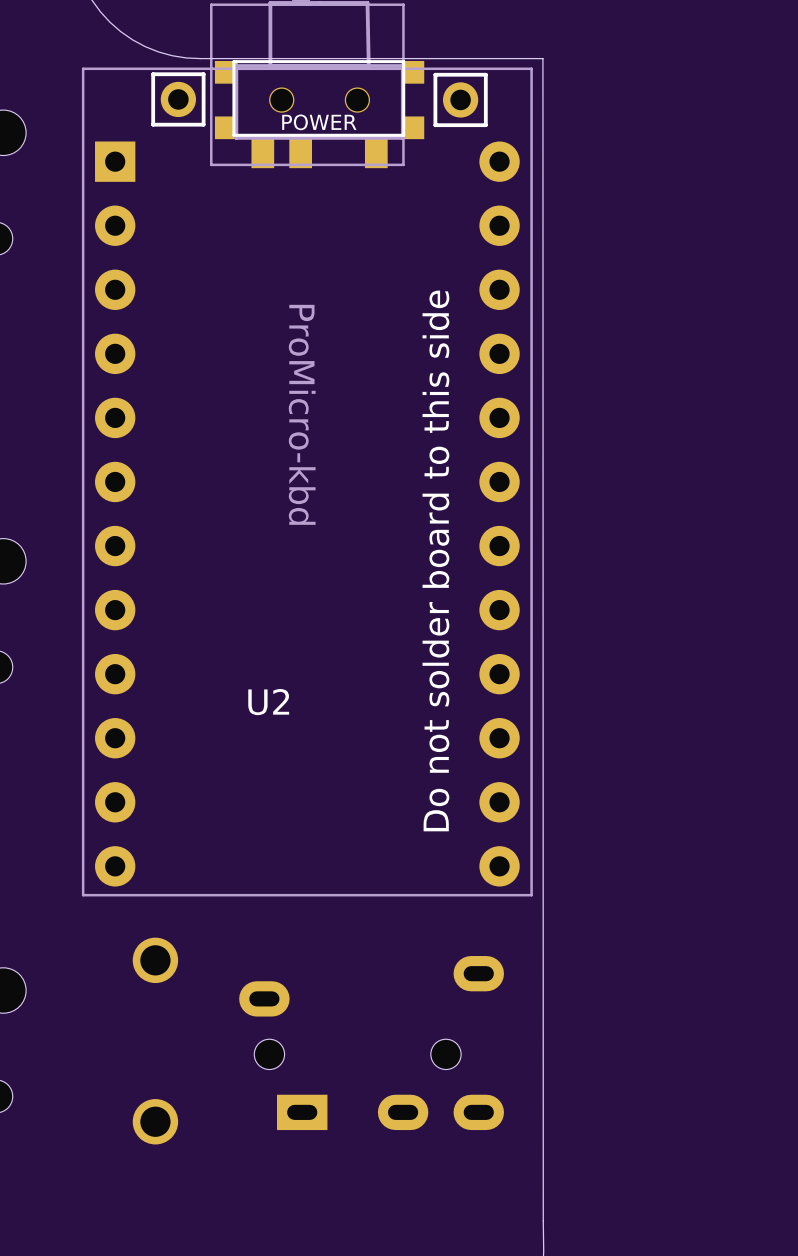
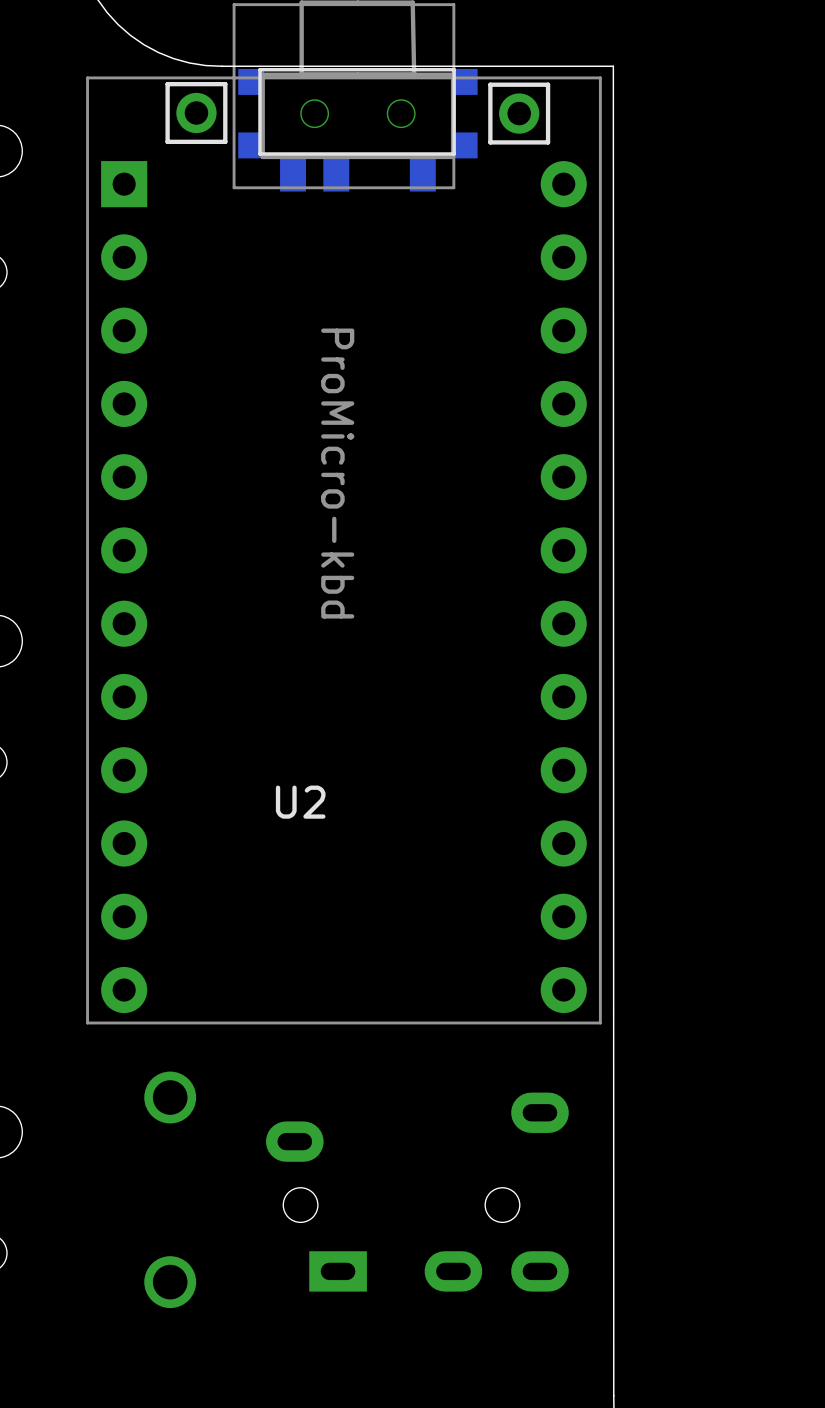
text: POWER (319, 122) -> none
text: Do not solder board to this side (435, 560) -> none

